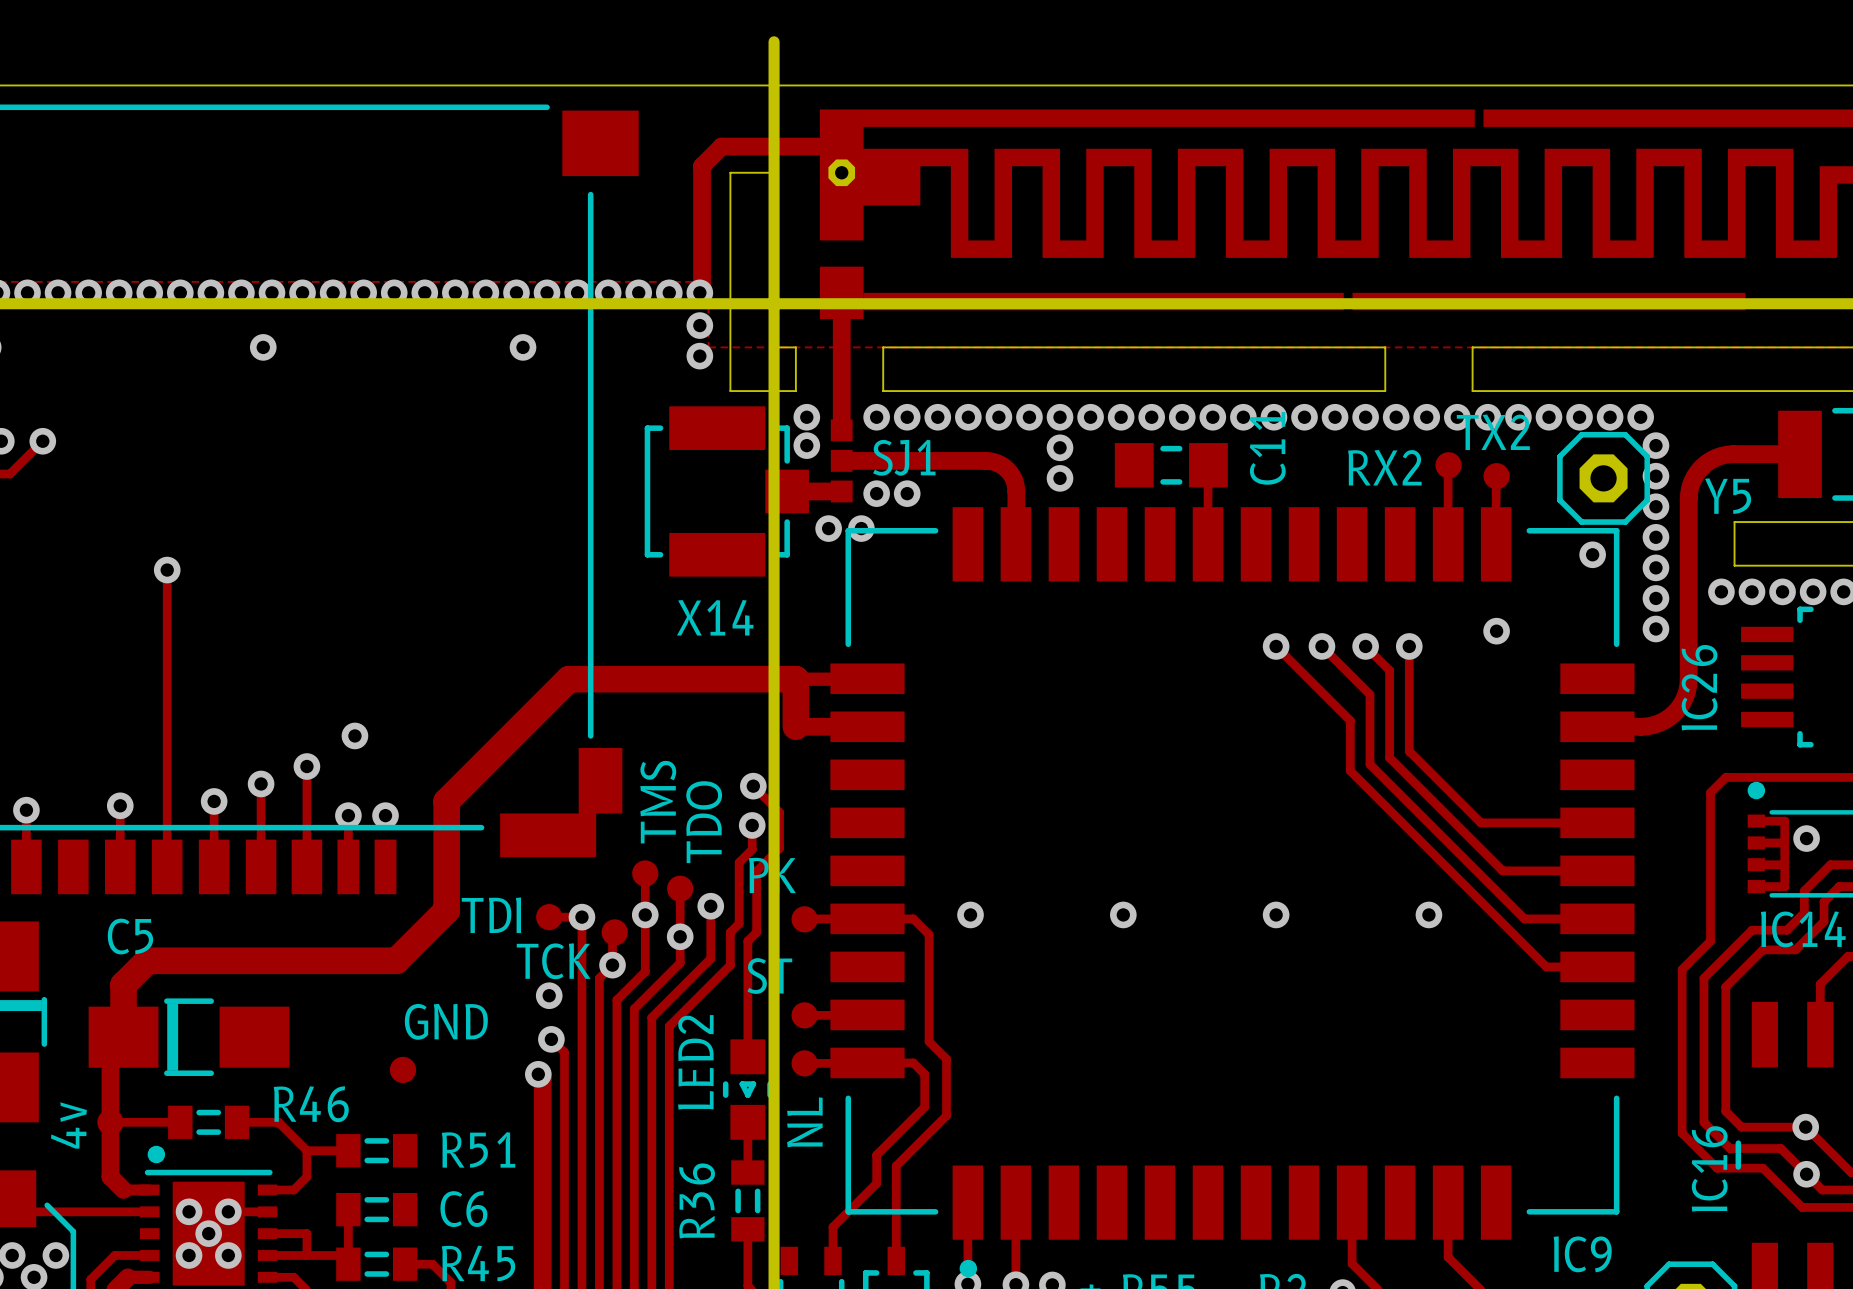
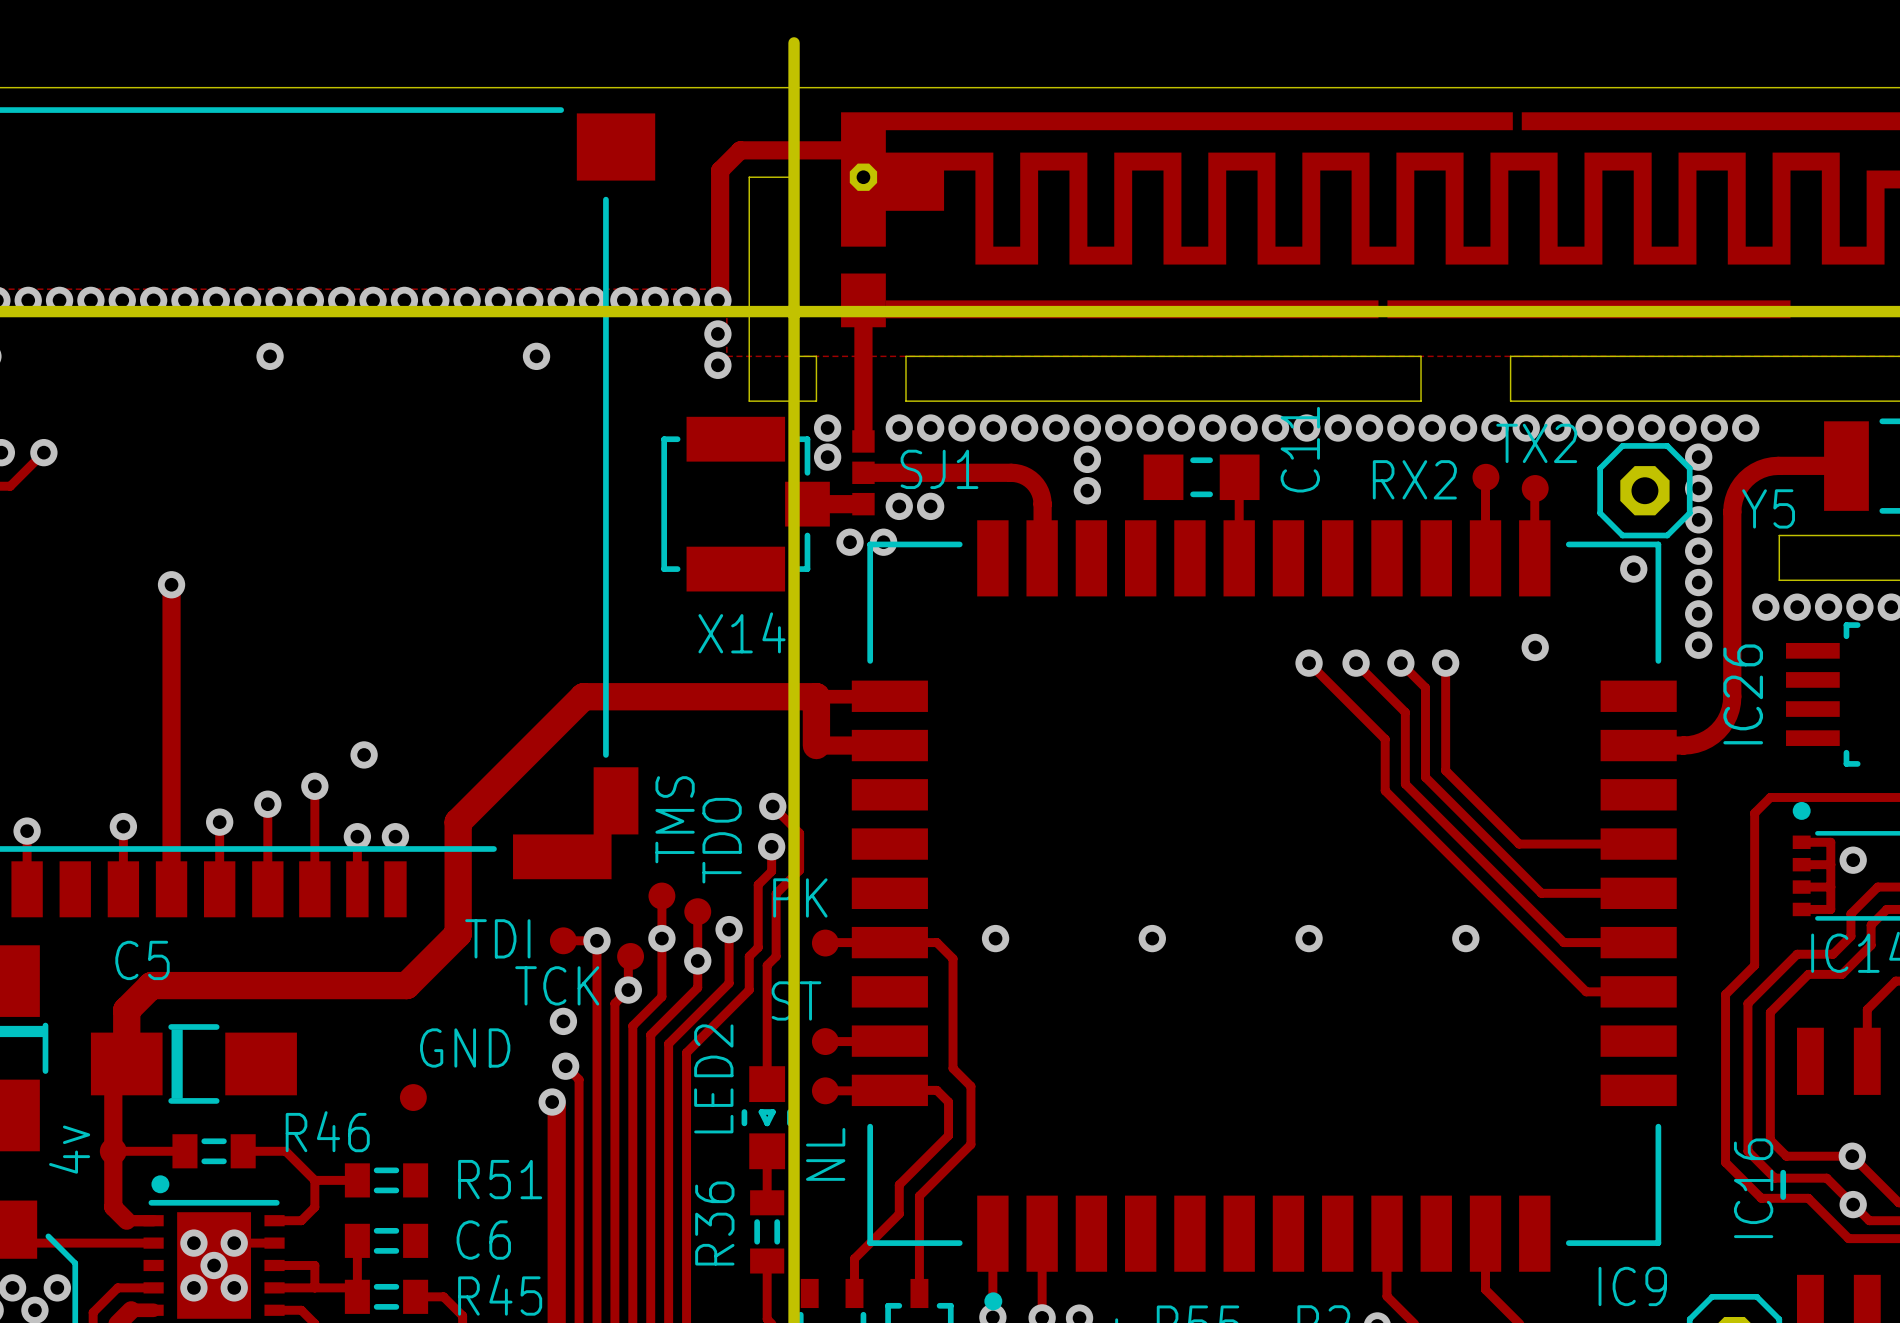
via: none -> (1714, 428)
via: none -> (1745, 428)
track width: thin (167, 570) (167, 866) -> thick (171, 584) (171, 889)

